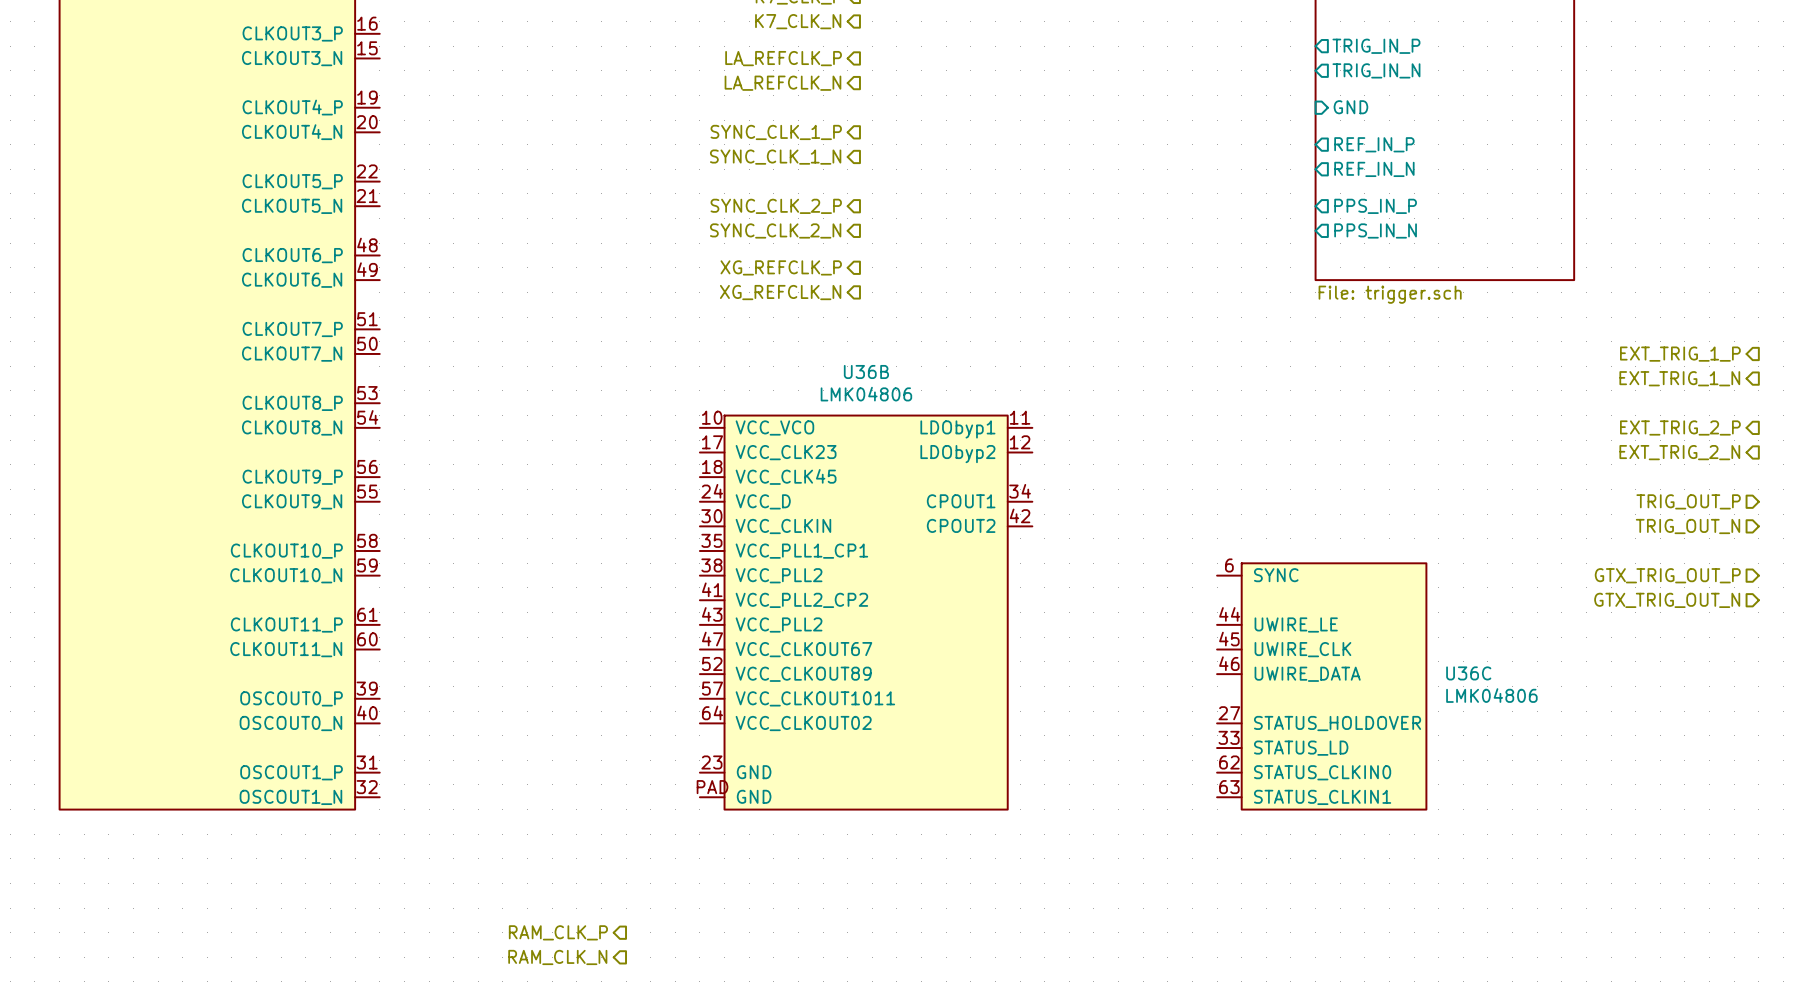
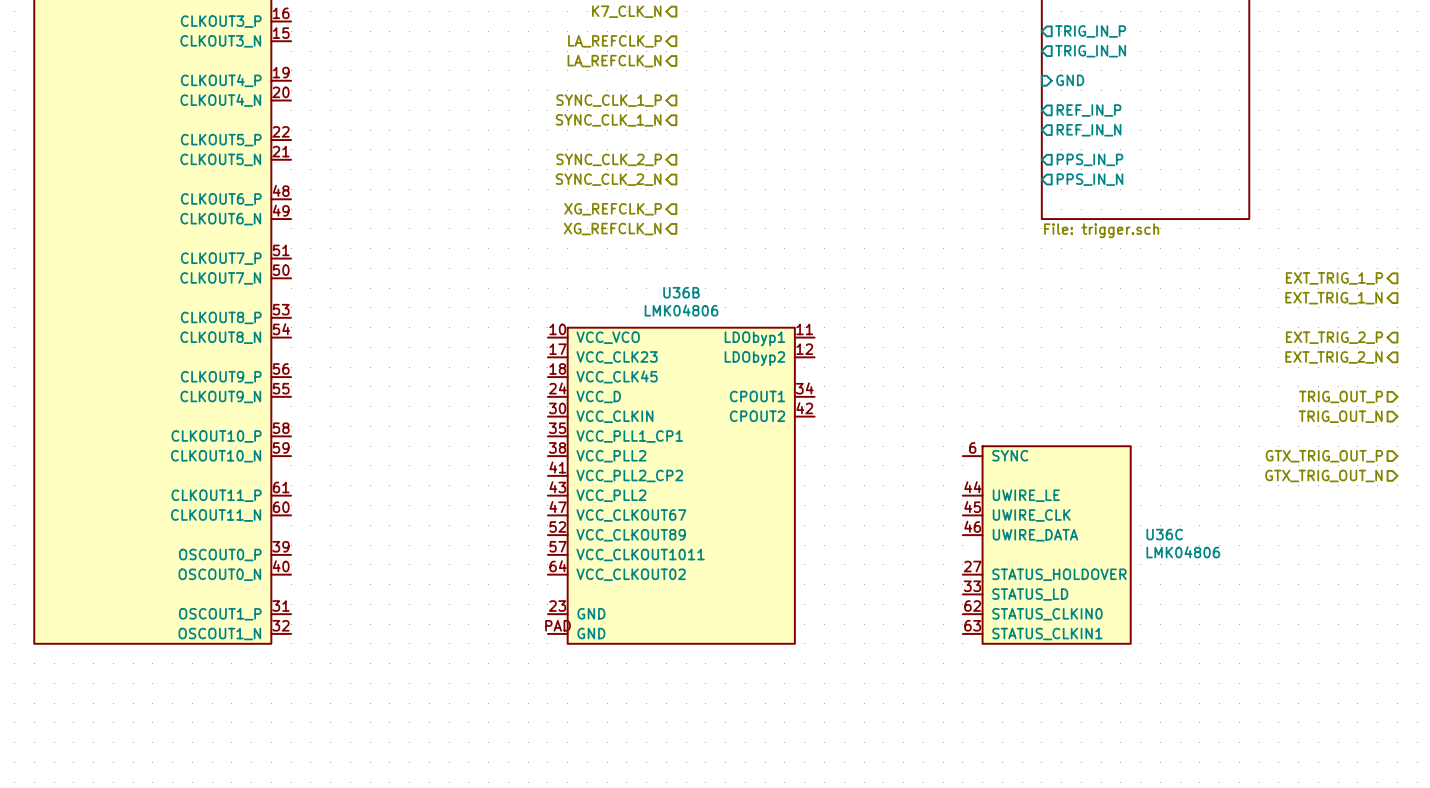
hierarchical label: RAM_CLK_P (558, 932) -> none
hierarchical label: RAM_CLK_N (557, 957) -> none

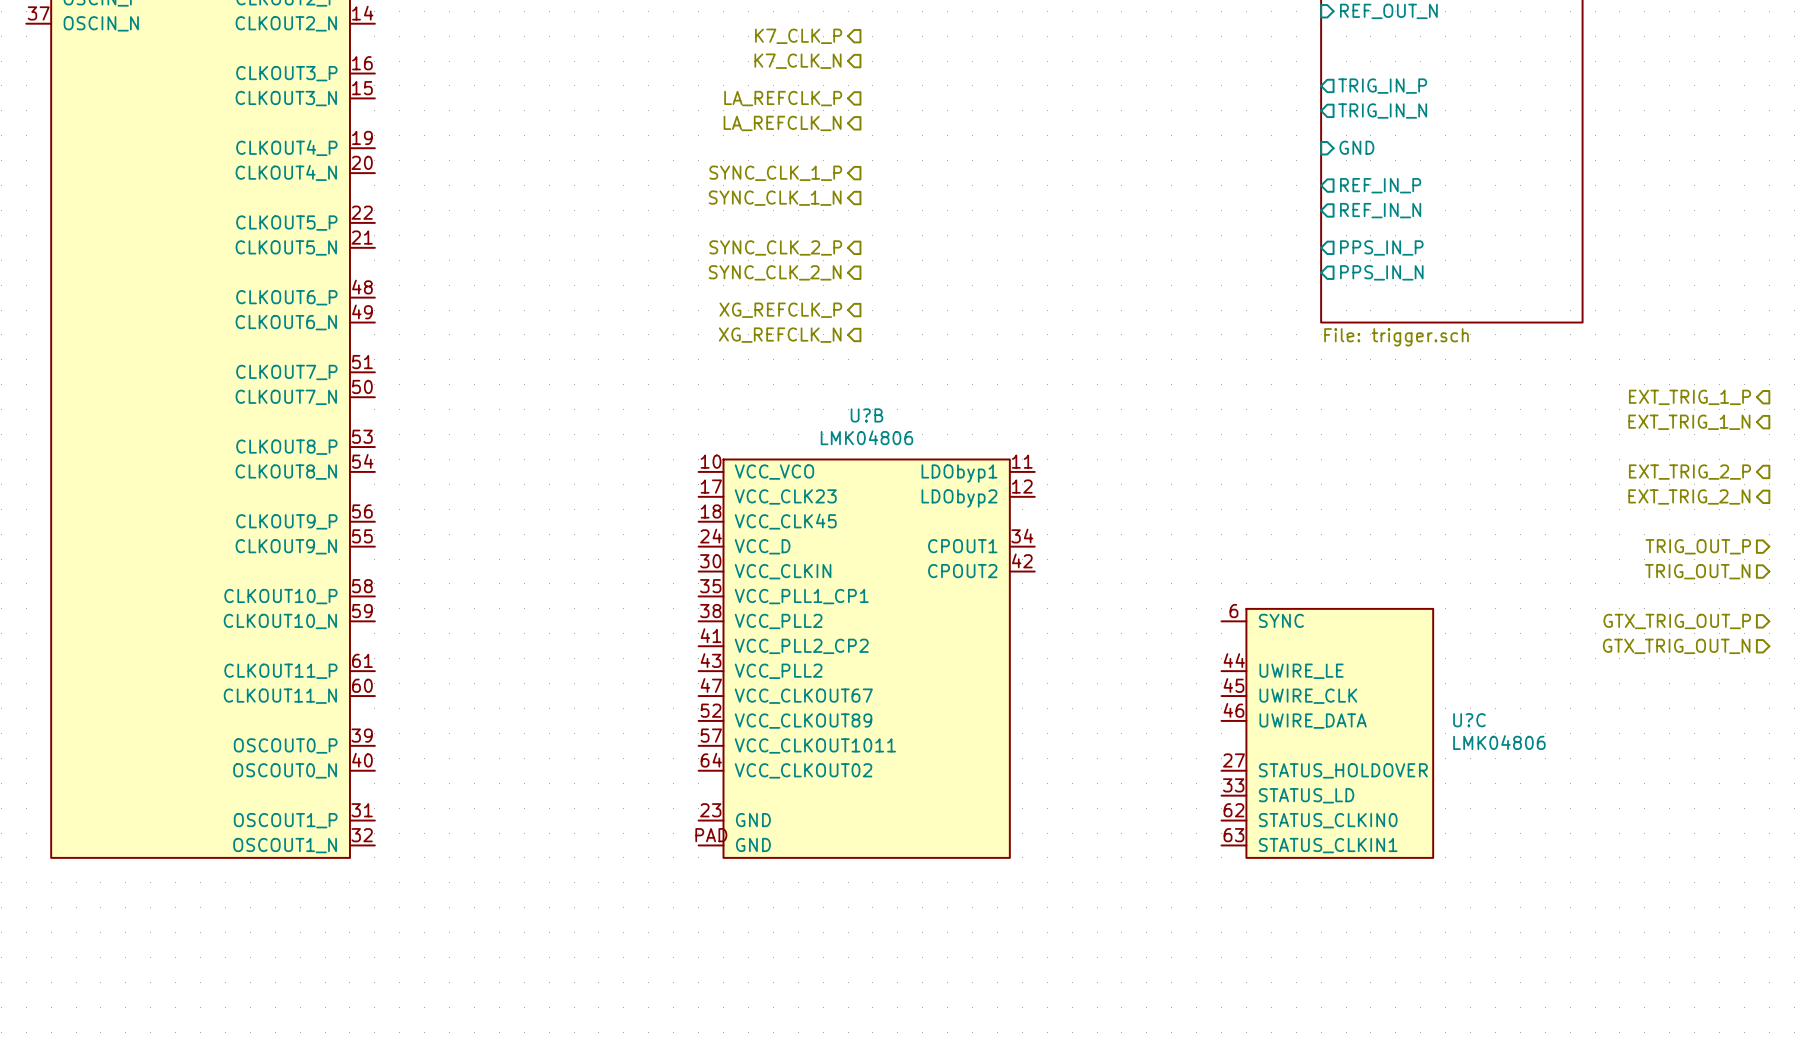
U36B name: U36B (681, 292) -> U?B (866, 415)
U36C name: U36C (1164, 534) -> U?C (1469, 720)

